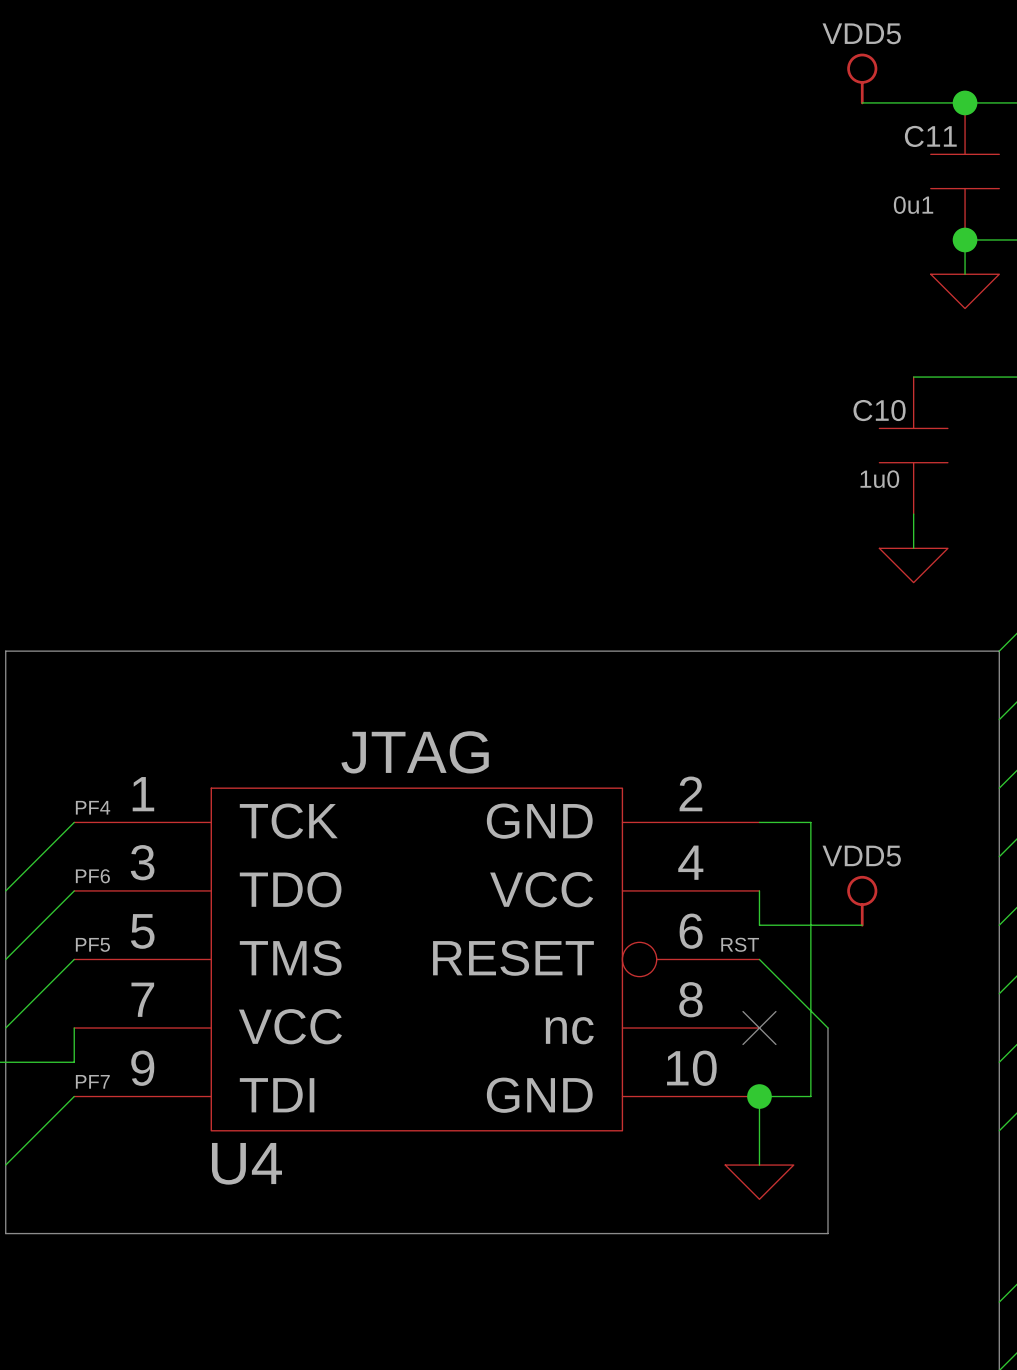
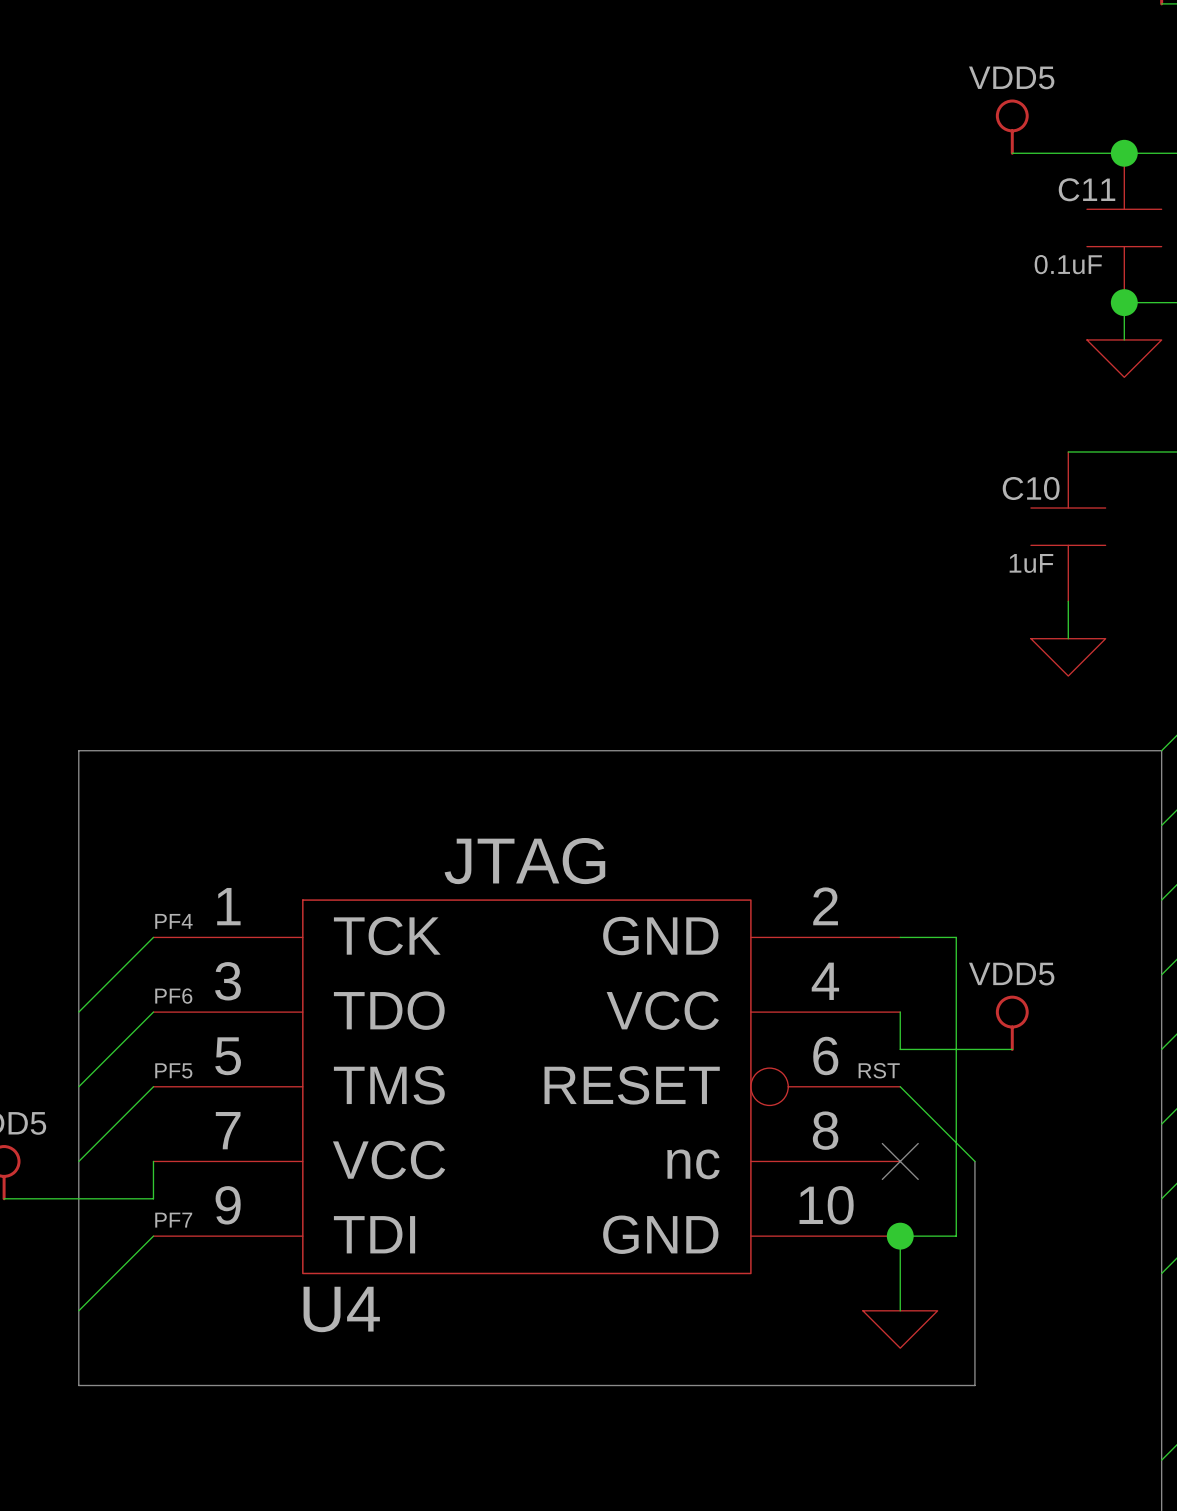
C11 value: 0u1 (913, 205) -> 0.1uF (1068, 264)
C10 value: 1u0 (879, 479) -> 1uF (1031, 563)

